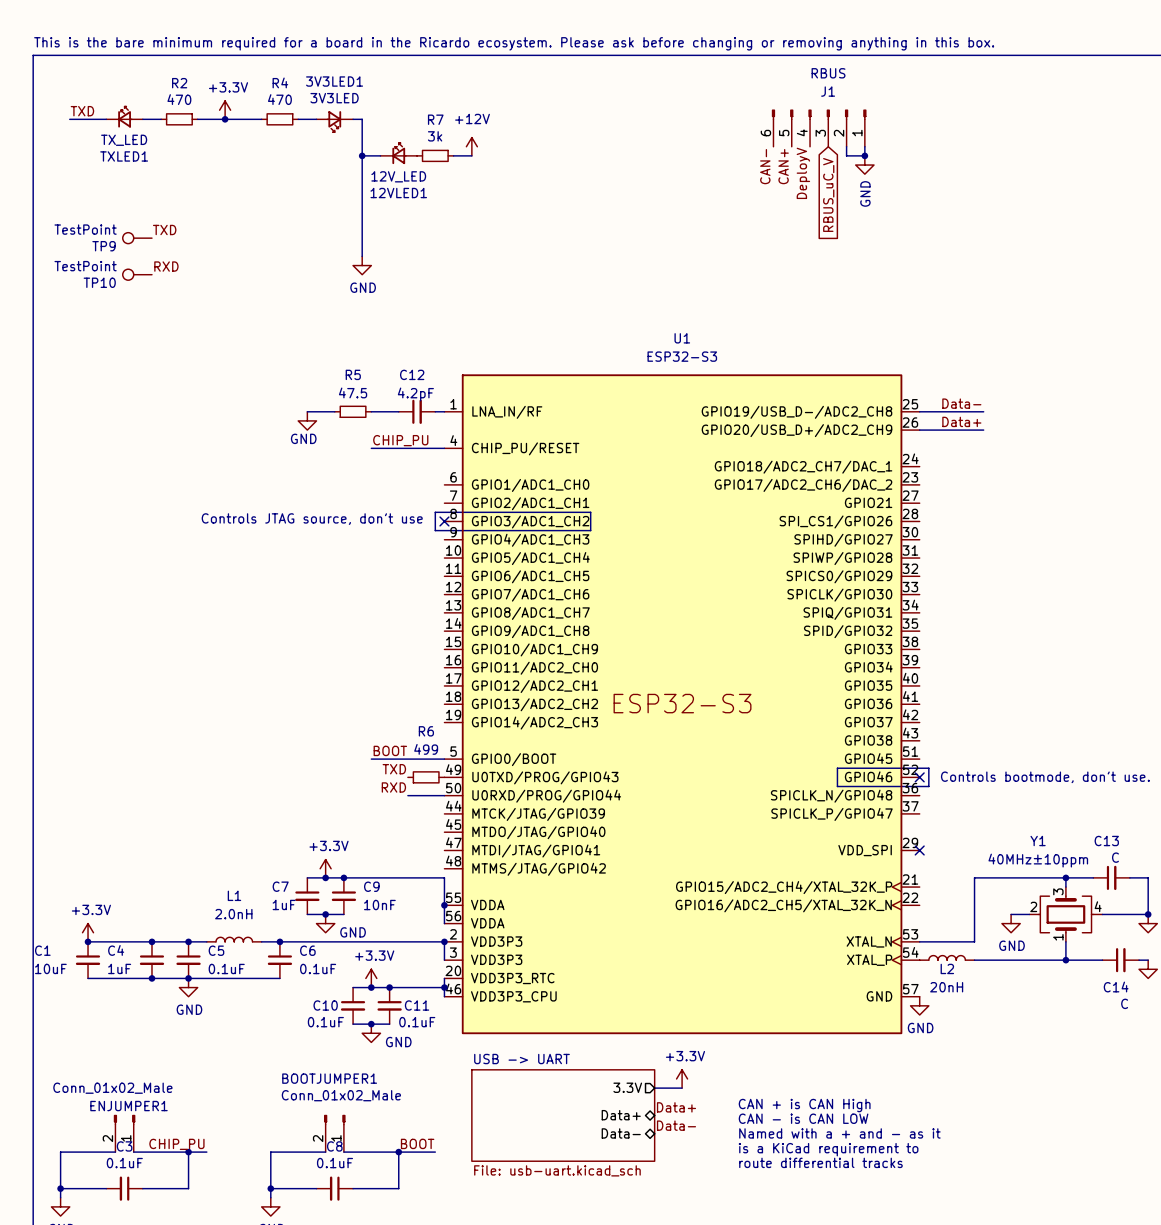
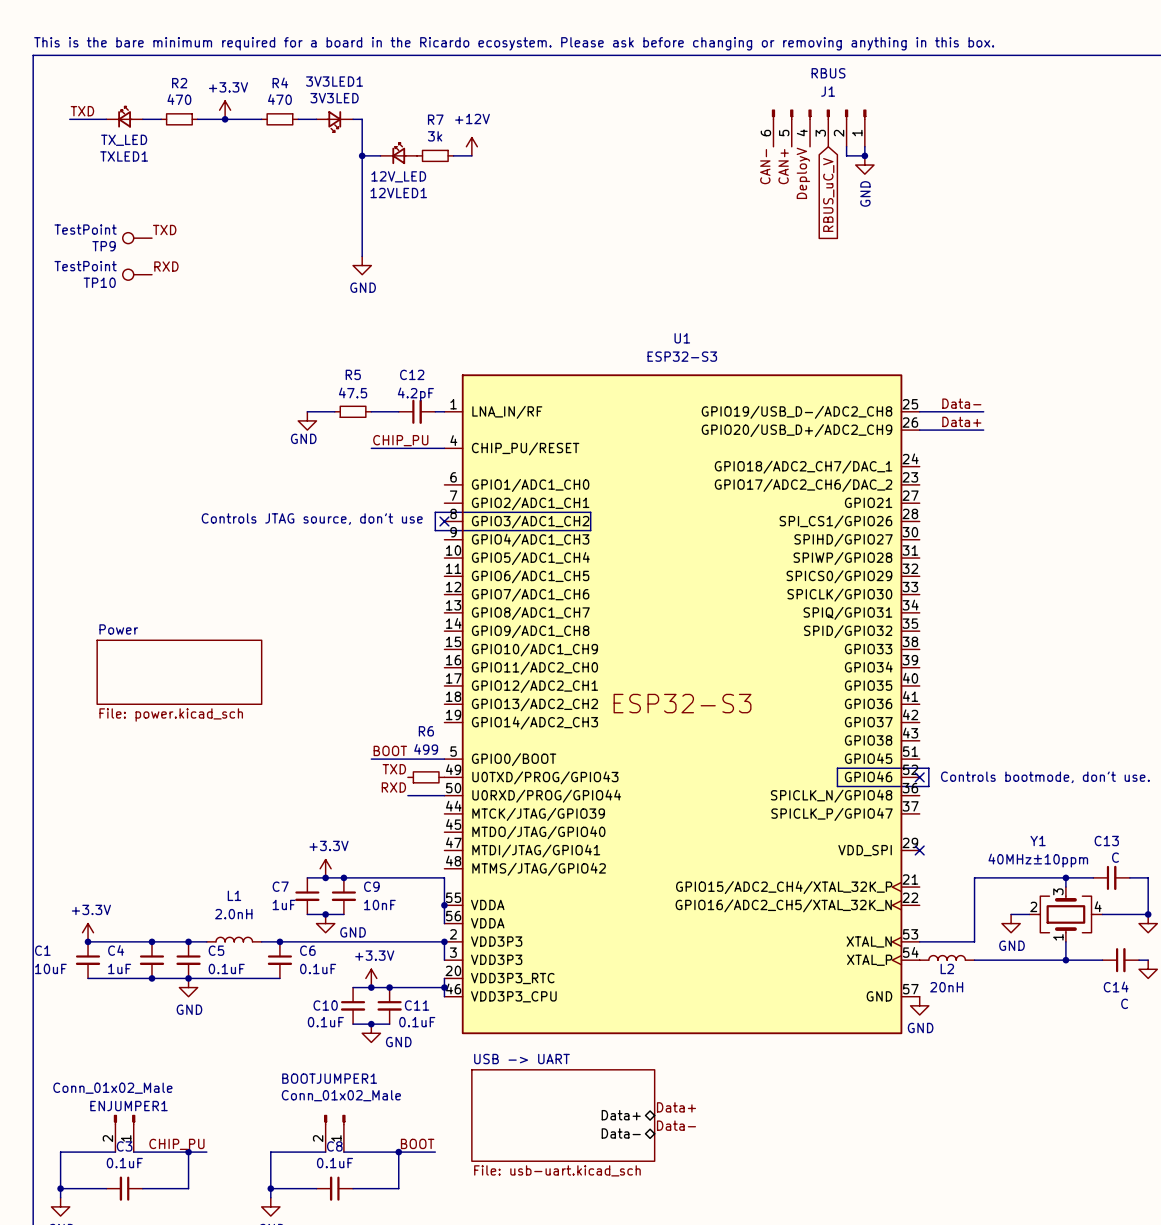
sheet Power: none -> File: power.kicad_sch (179, 672)
power symbol: +3.3V (682, 1078) -> none
sheet pin: 3.3V (627, 1087) -> none
wire: (654, 1088) (682, 1088) -> none
text: CAN + is CAN High (804, 1105) -> none
text: CAN - is CAN LOW (803, 1118) -> none
text: Named with a + and - as it (839, 1133) -> none
text: is a KiCad requirement to (828, 1149) -> none
text: route differential tracks (820, 1162) -> none

